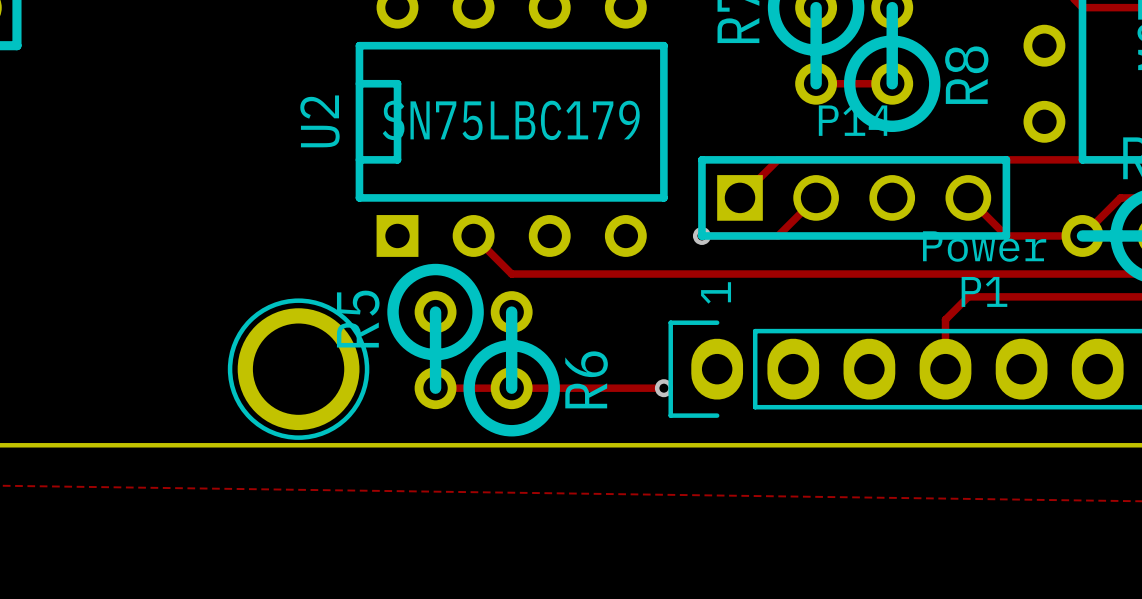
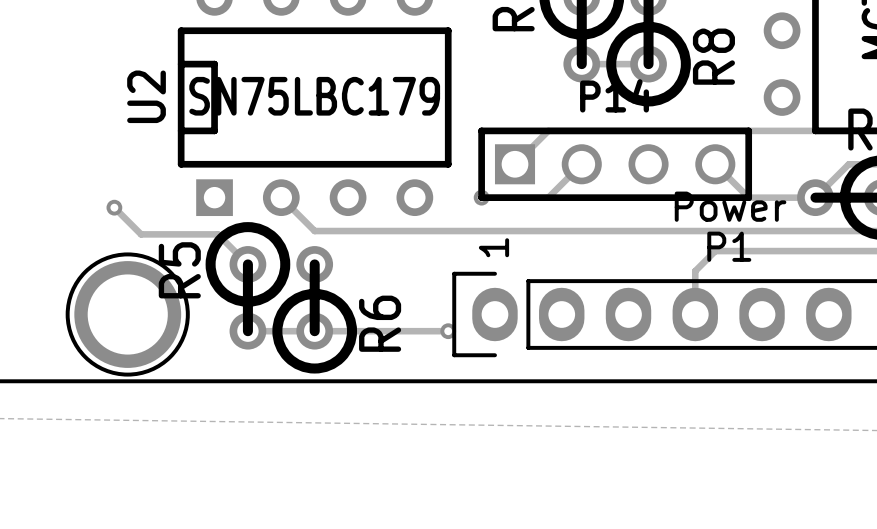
track: none -> (114, 207) (141, 234) (217, 234) (247, 264)
via: none -> (114, 207)

